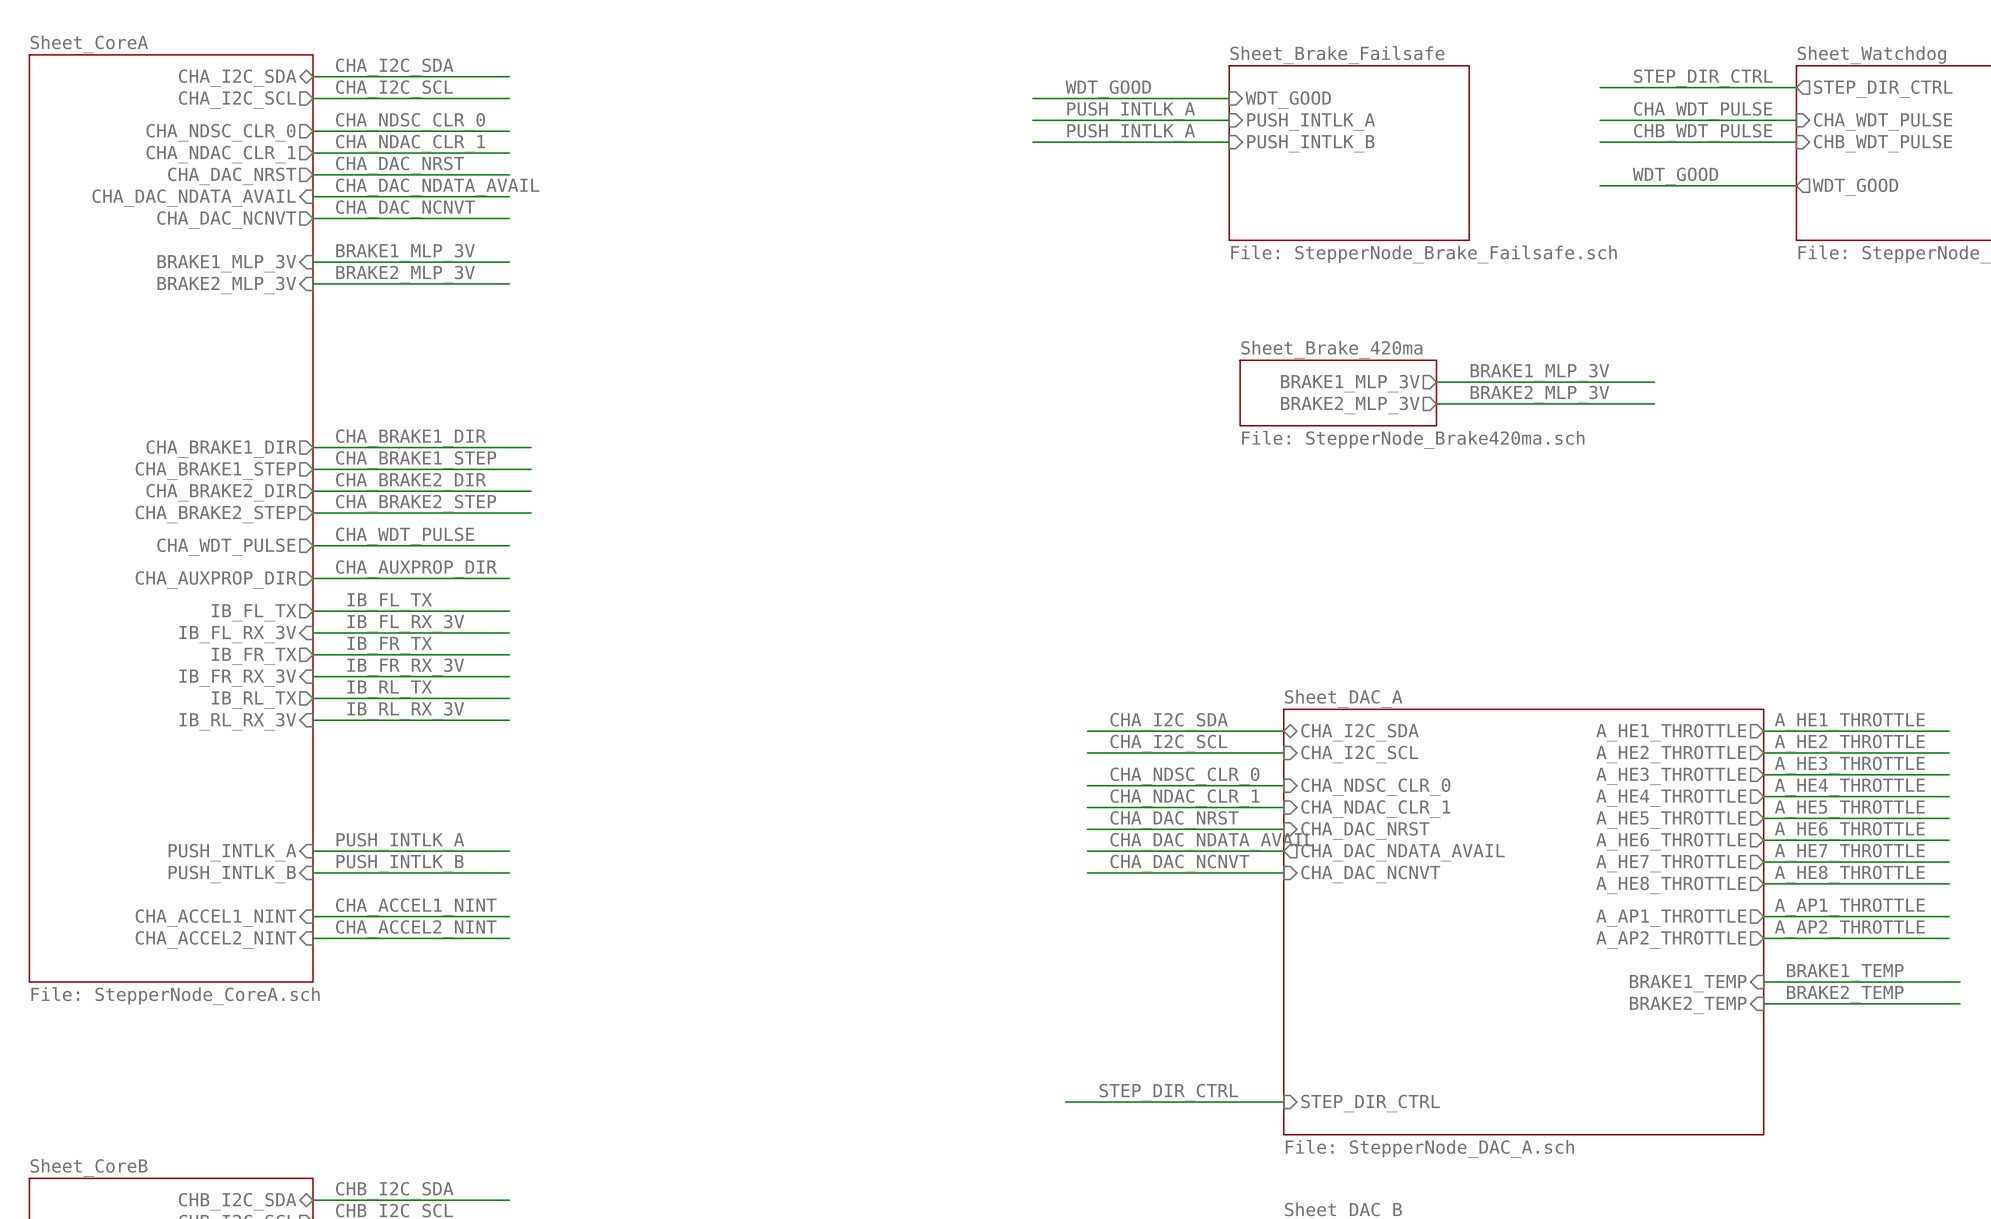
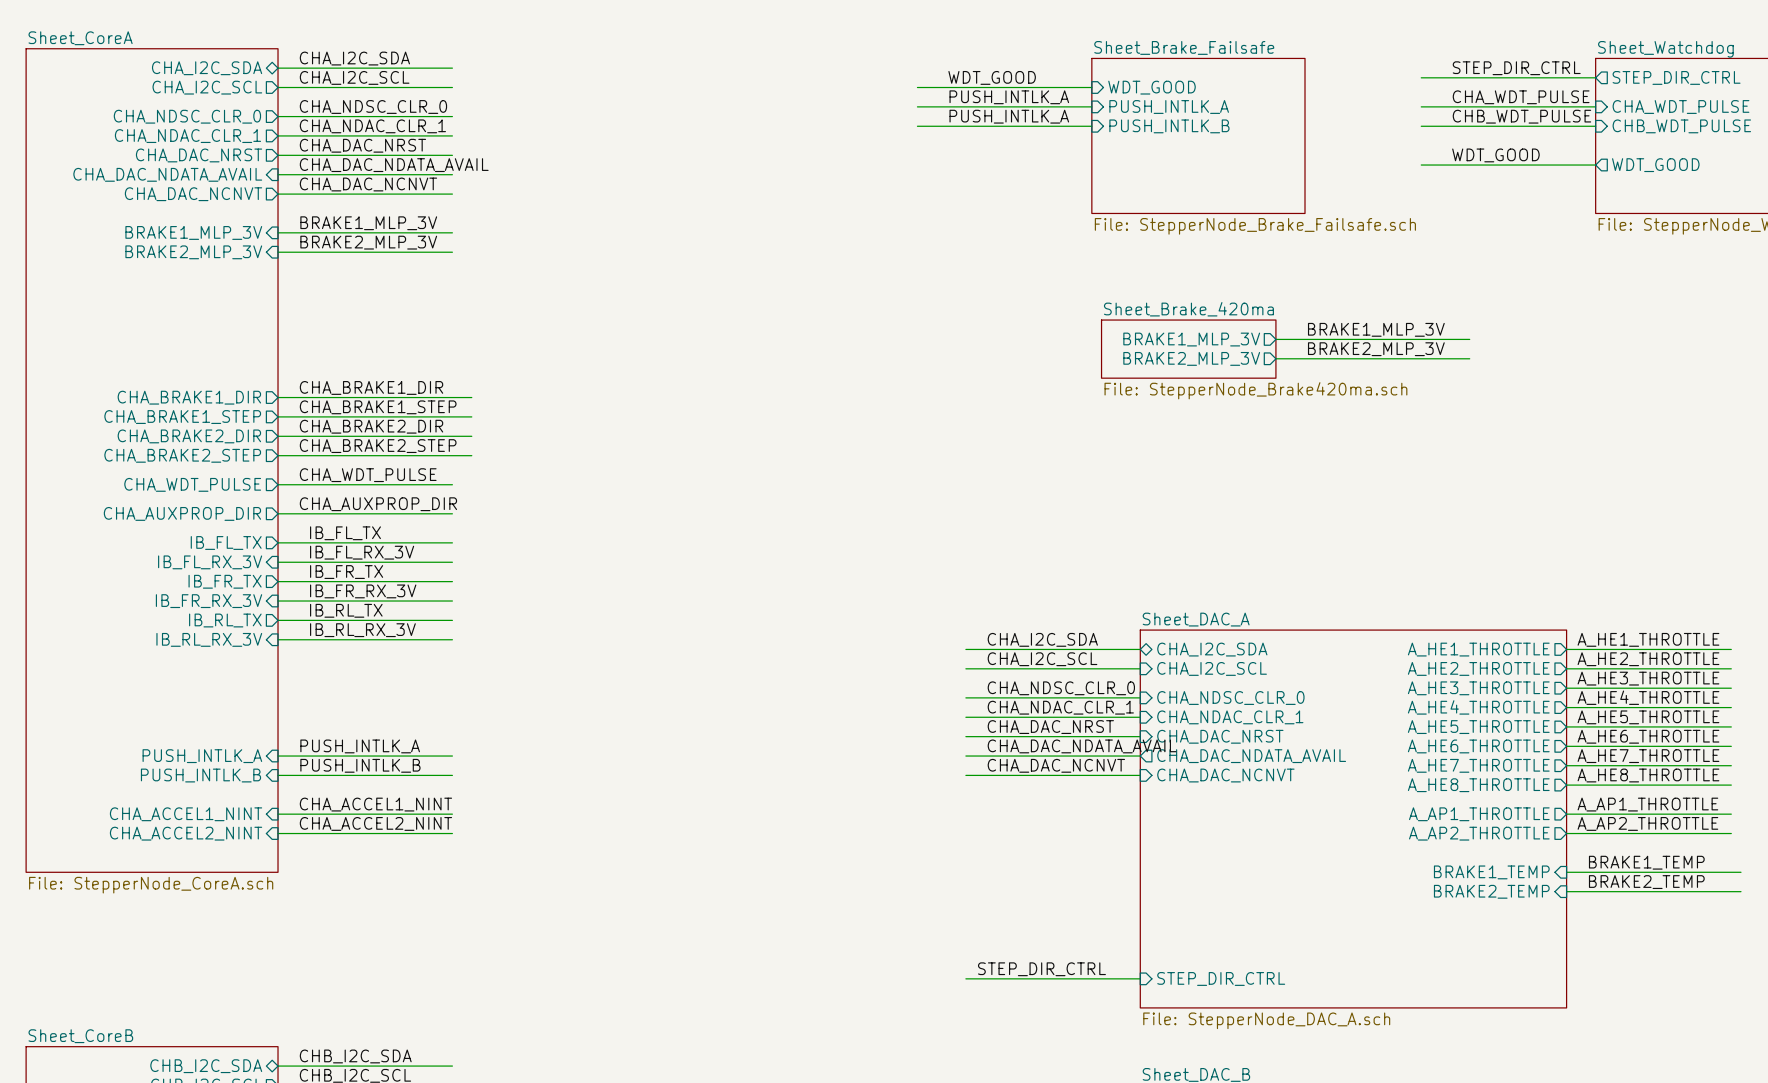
wire: (1065, 1102) (1087, 1102) -> none

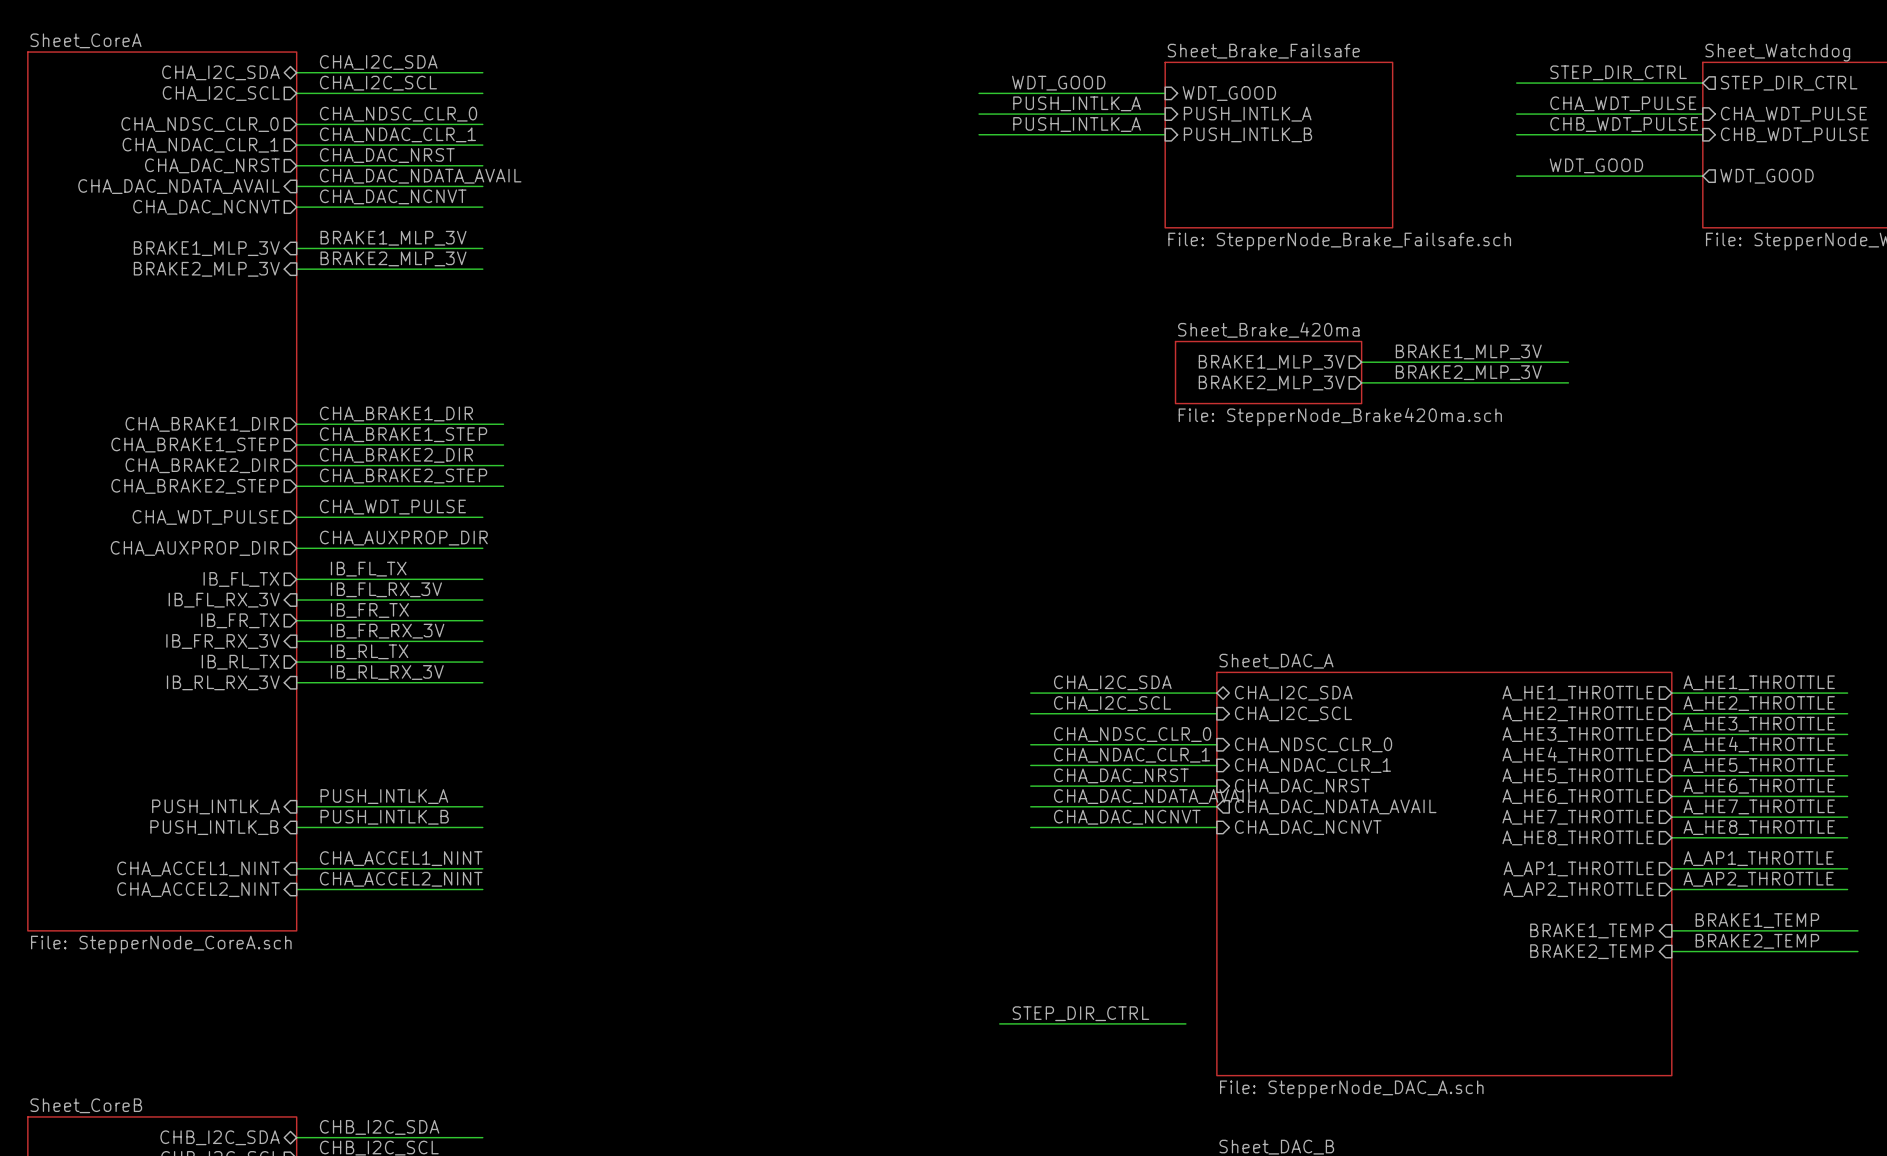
label position: STEP_DIR_CTRL (1041, 969) -> STEP_DIR_CTRL (1080, 1013)
wire: (965, 978) (1140, 978) -> (999, 1023) (1185, 1023)
sheet pin: STEP_DIR_CTRL (1221, 978) -> none

